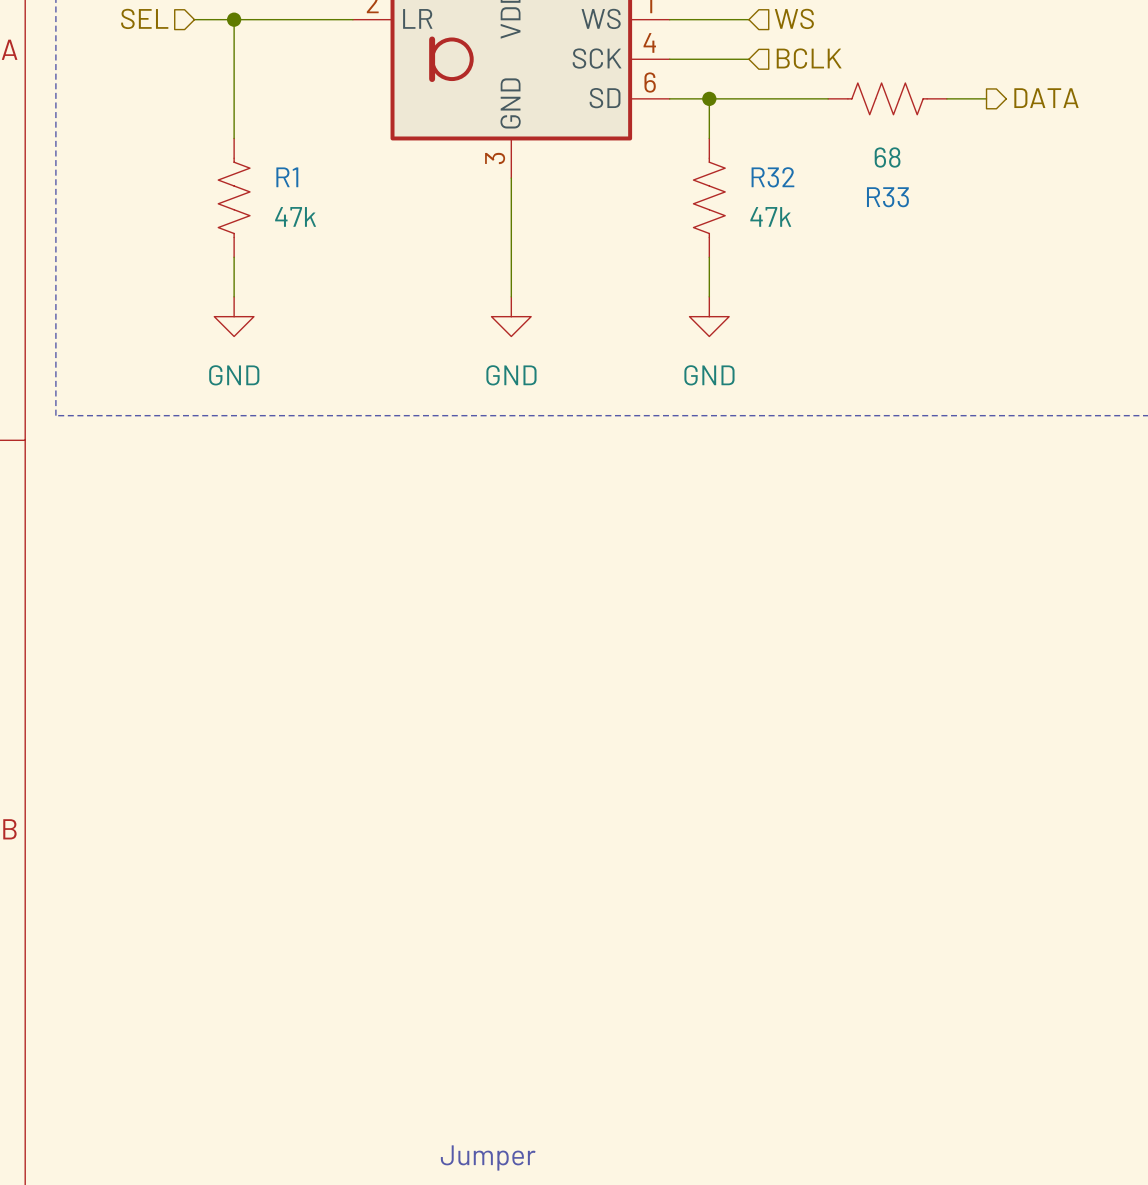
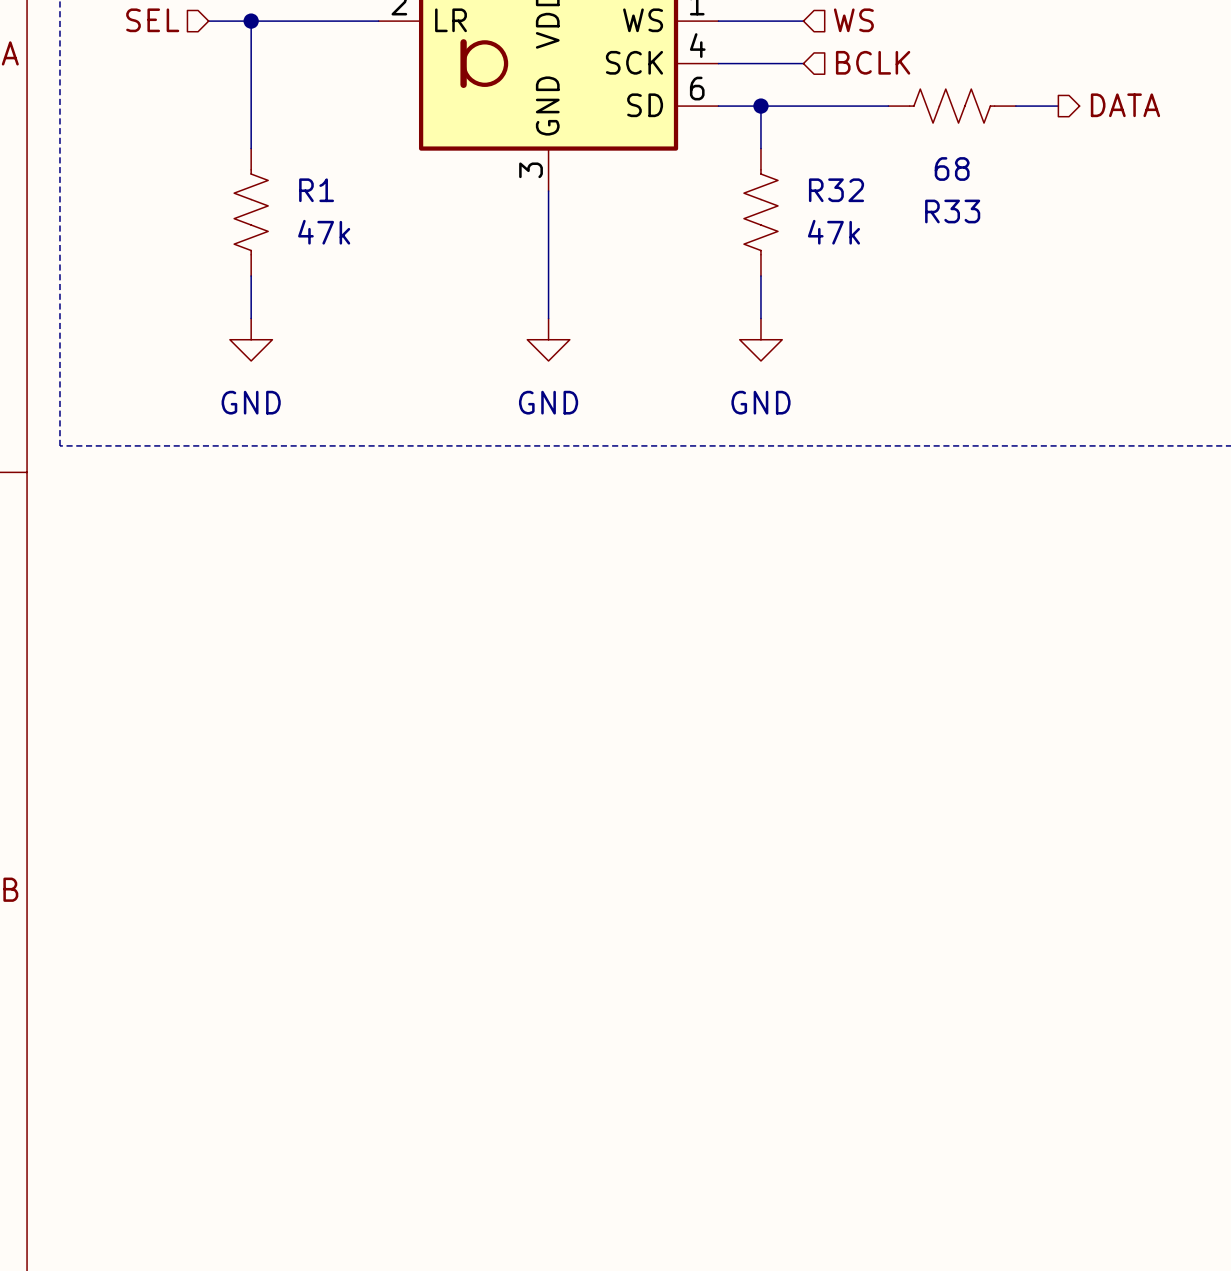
text: Jumper (488, 1157) -> none

